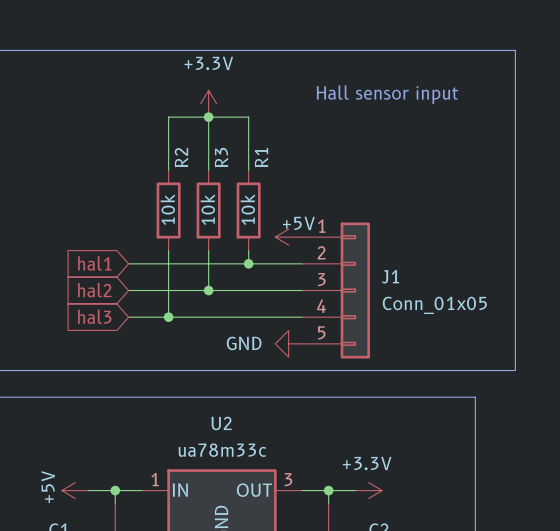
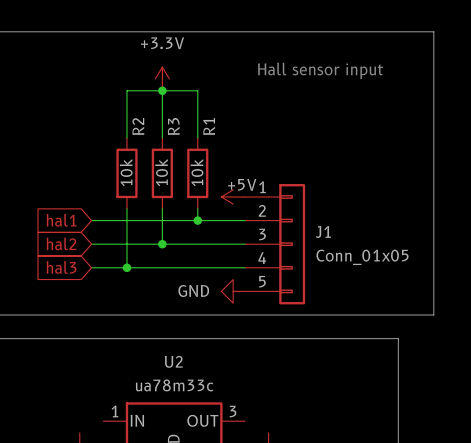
power symbol: +5V (75, 490) -> none
wire: (88, 490) (141, 490) -> none
wire: (115, 490) (115, 503) -> none
junction: (115, 490) -> none
wire: (301, 490) (355, 490) -> none
wire: (328, 490) (328, 503) -> none
junction: (328, 490) -> none
power symbol: +3.3V (368, 490) -> none

